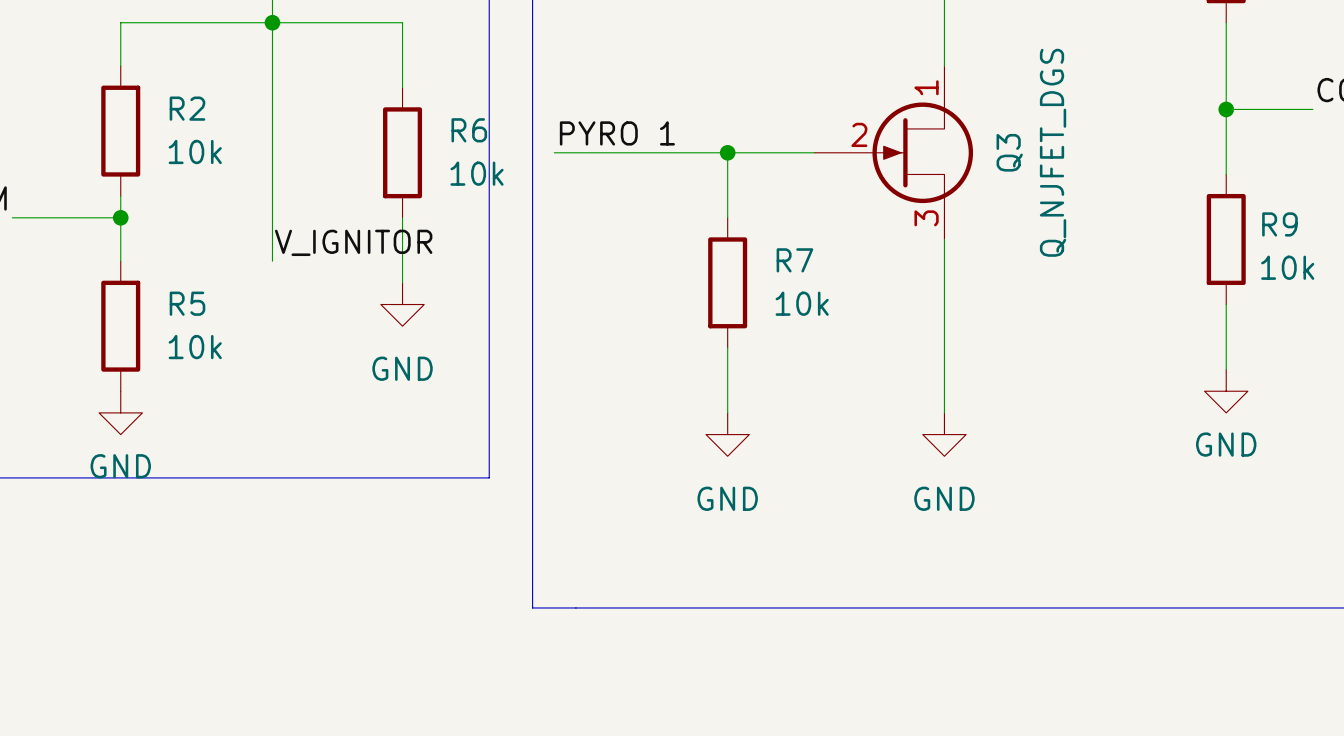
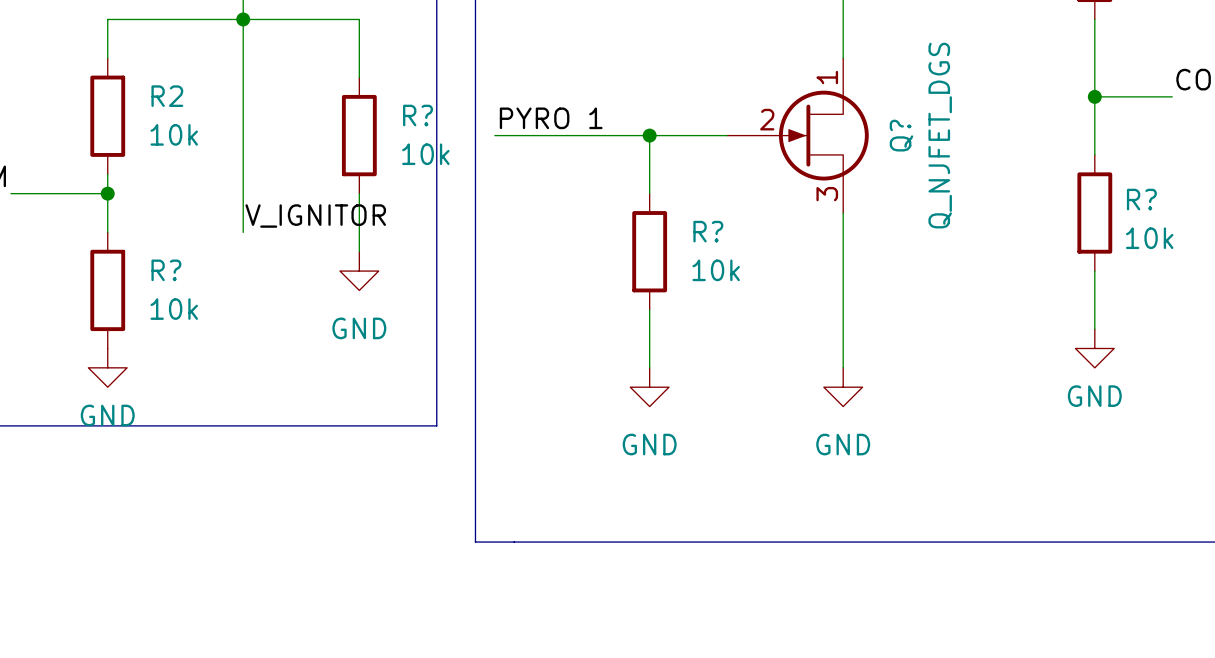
R6 name: R6 (469, 130) -> R? (418, 115)
Q3 name: Q3 (1009, 152) -> Q? (901, 135)
R9 name: R9 (1279, 224) -> R? (1141, 199)
R7 name: R7 (794, 260) -> R? (708, 231)
R5 name: R5 (187, 303) -> R? (166, 270)

